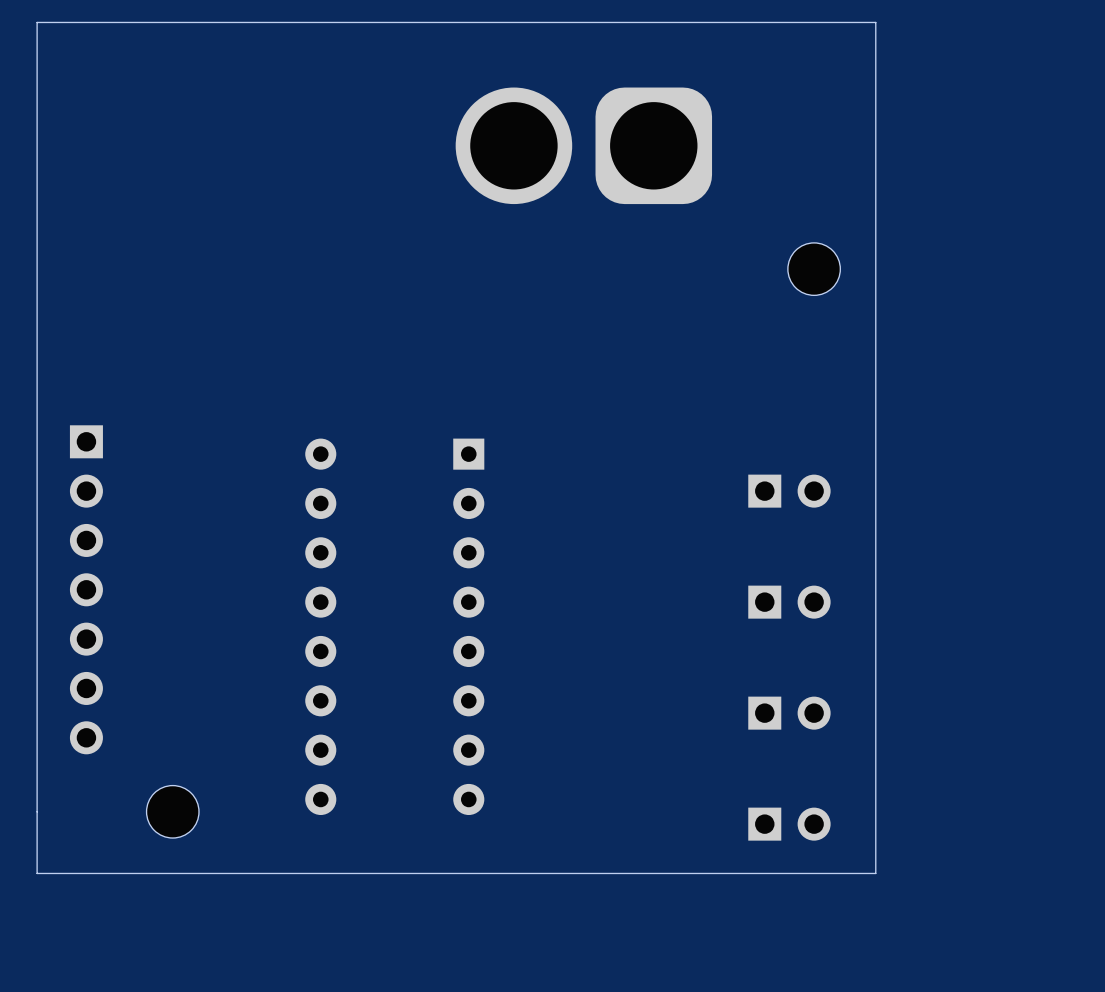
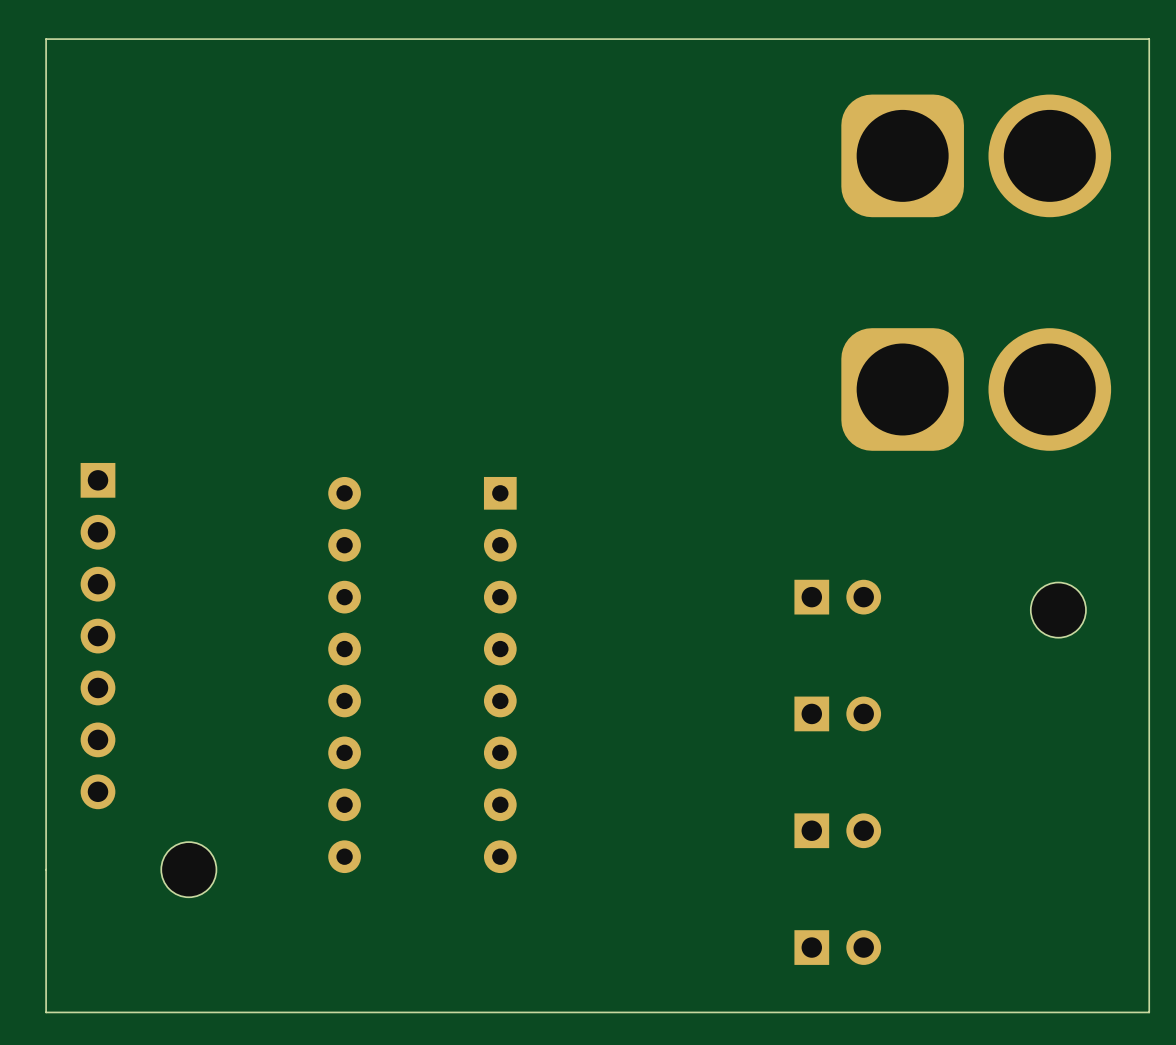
board edge: (875, 22) (875, 873) (37, 873) -> (928, 39) (1149, 39) (1149, 1012) (46, 1012) (46, 934)
part: none -> (976, 155)
part: (583, 145) -> none
part position: (814, 269) -> (1058, 610)
part: none -> (976, 389)
part: (789, 491) -> none
part: none -> (837, 597)
part: (789, 602) -> none
part: none -> (837, 713)
part: (789, 713) -> none
part: none -> (837, 830)
part: (789, 824) -> none
part: none -> (837, 947)

